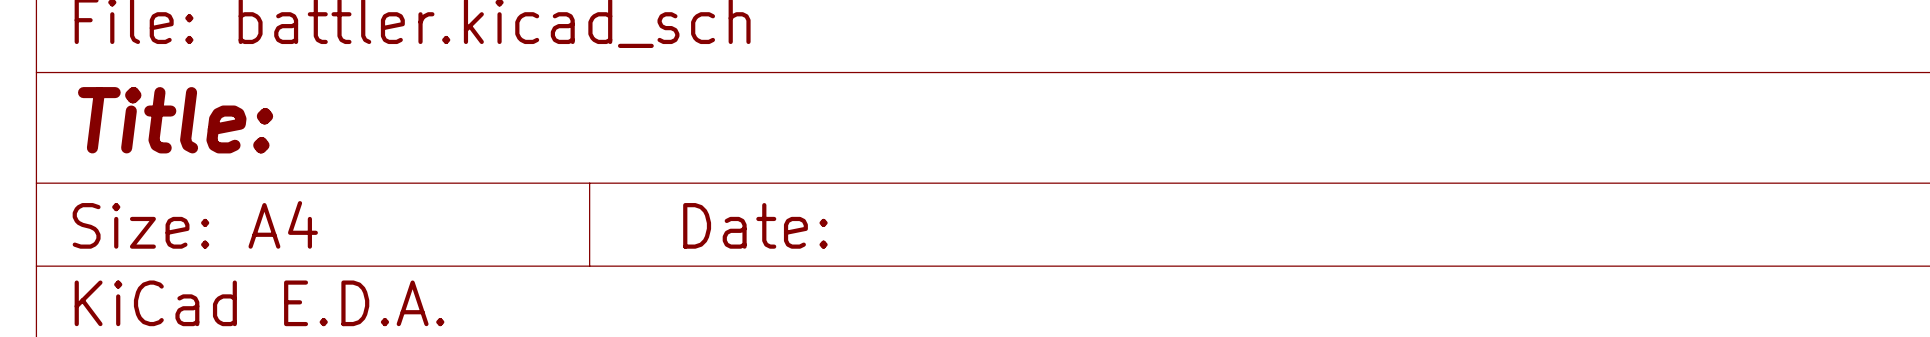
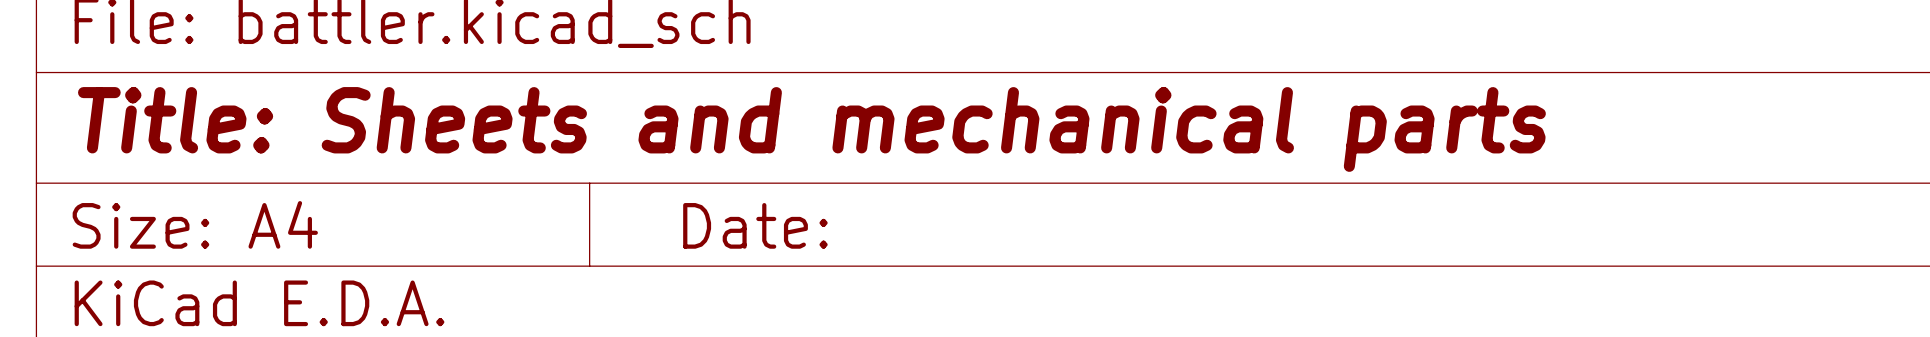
title block: Title: (175, 120) -> Title: Sheets and mechanical parts (811, 129)

